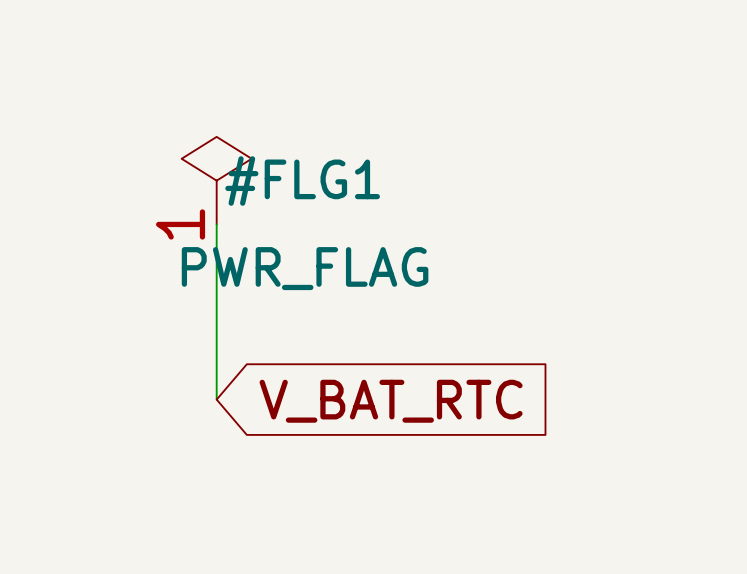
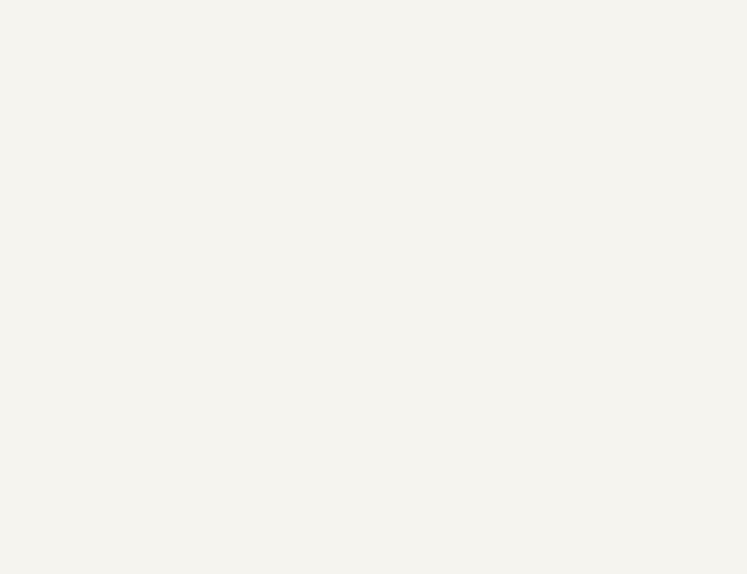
#FLG1: PWR_FLAG (216, 180) -> none
wire: (216, 224) (216, 399) -> none
global label: V_BAT_RTC (391, 401) -> none

